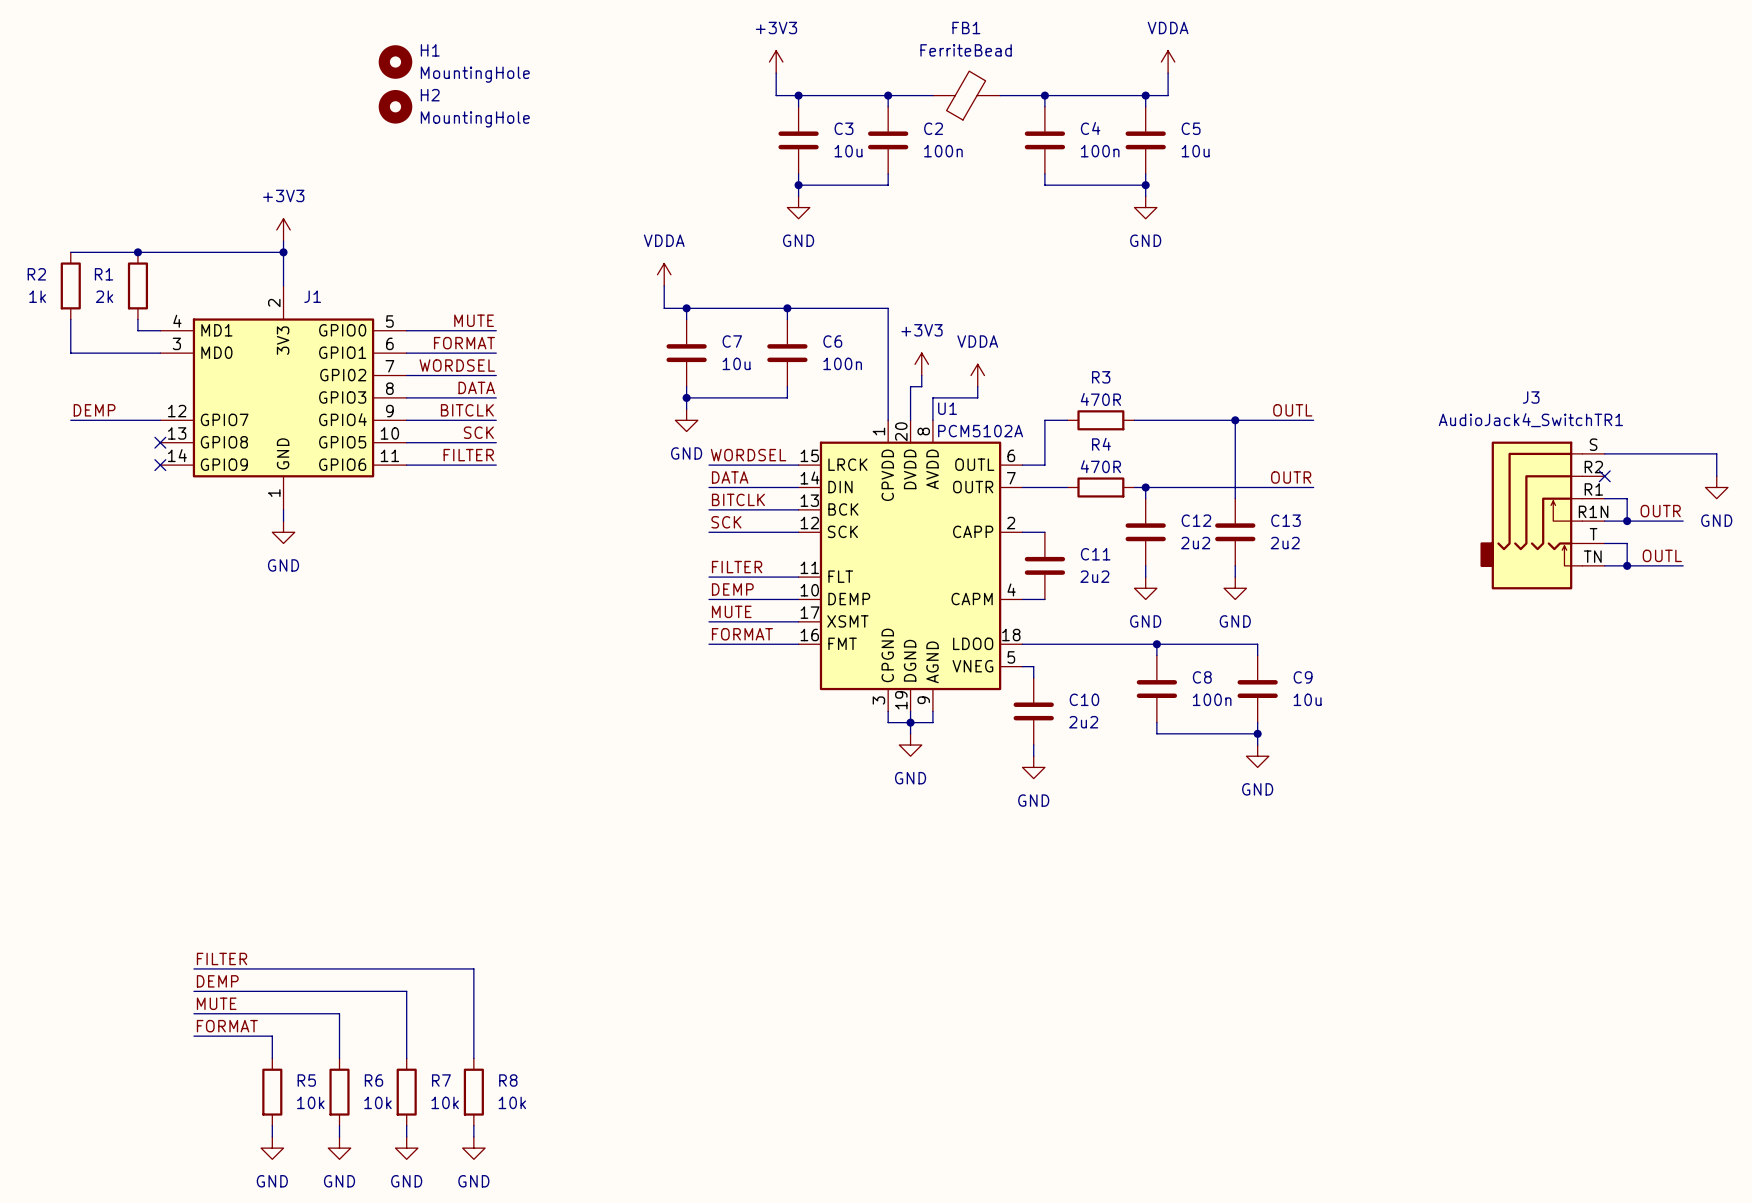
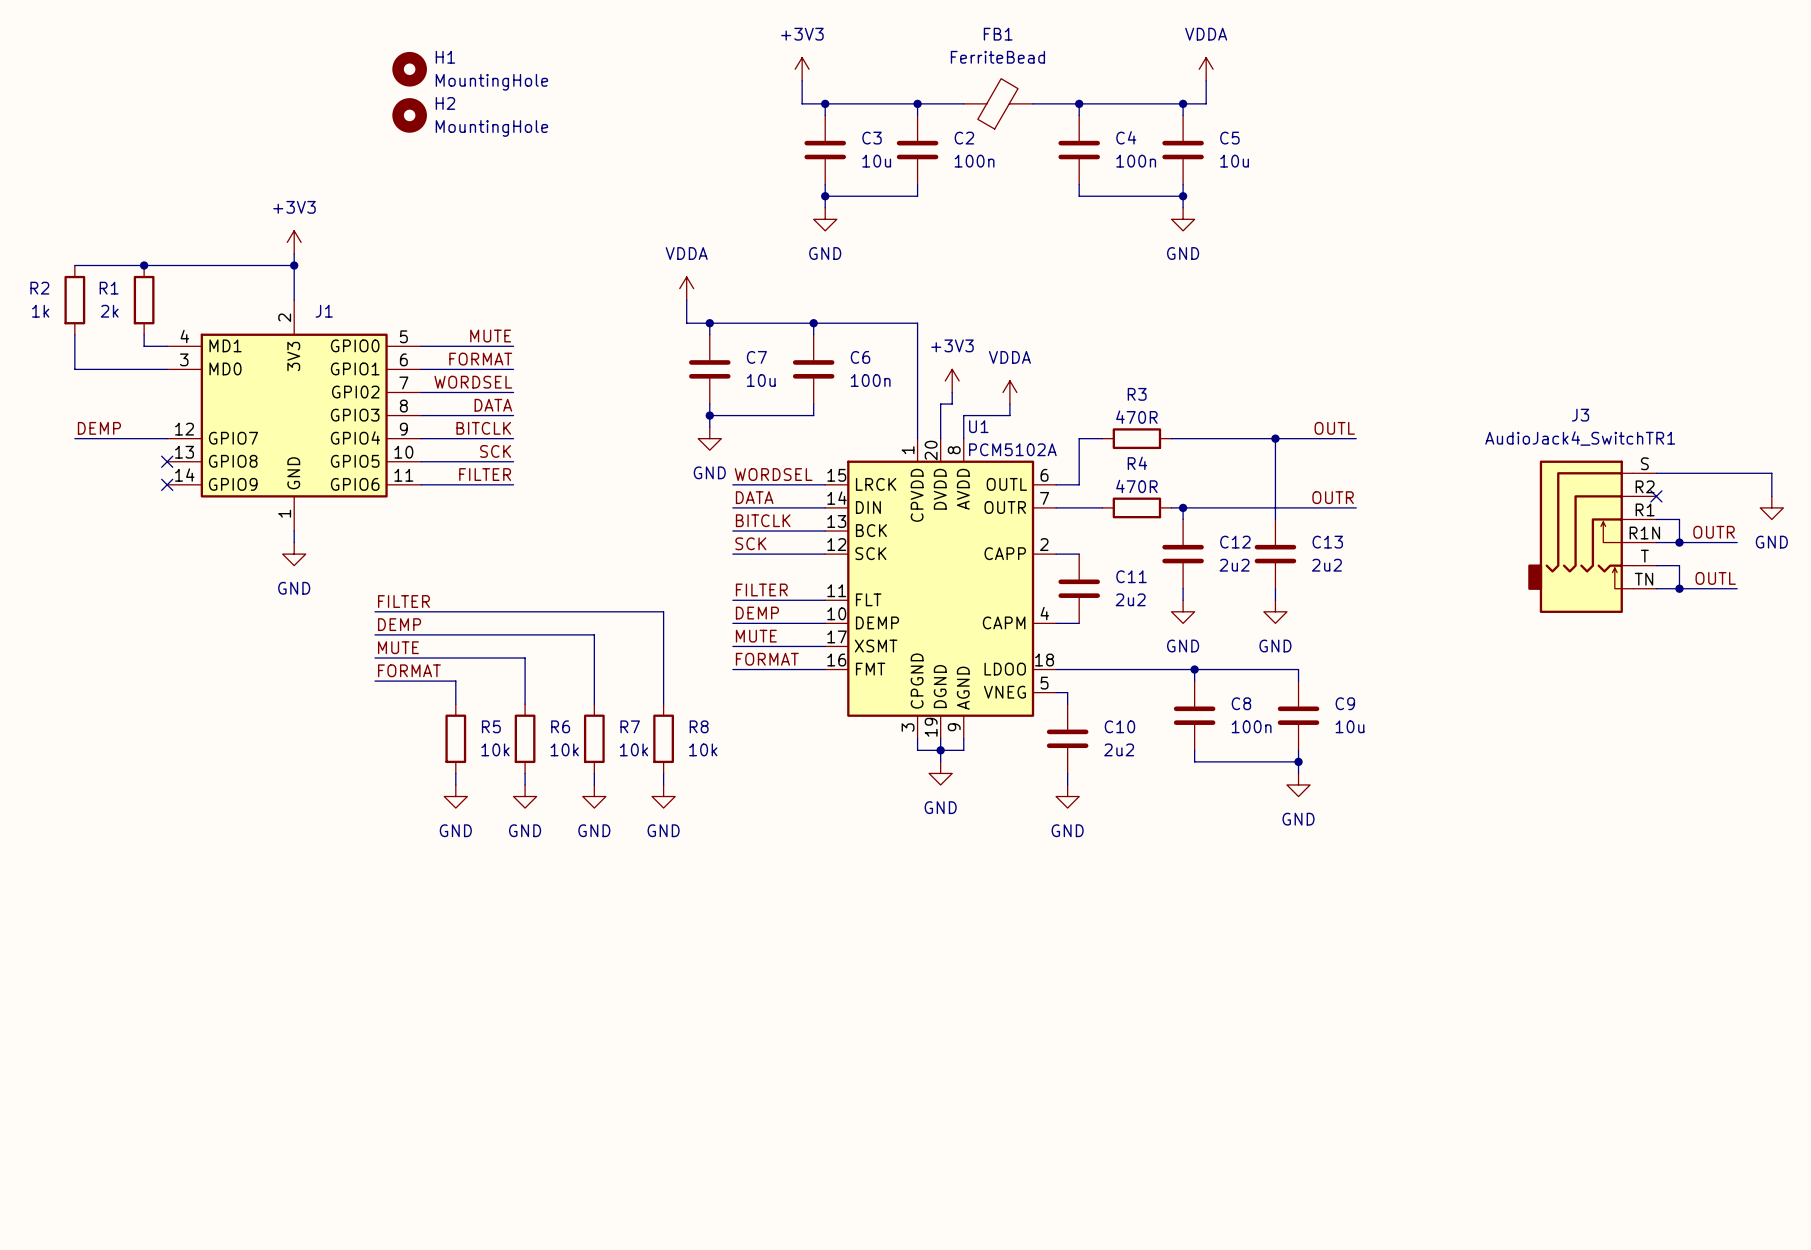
label: none -> FILTER (403, 601)
wire: none -> (375, 611) (663, 611) (663, 704)
label: none -> DEMP (399, 624)
wire: none -> (375, 634) (594, 634) (594, 704)
label: none -> MUTE (398, 647)
wire: none -> (375, 657) (525, 657) (525, 704)
label: none -> FORMAT (409, 670)
wire: none -> (375, 681) (455, 681) (455, 704)
wire: none -> (455, 773) (455, 784)
wire: none -> (525, 773) (525, 784)
wire: none -> (594, 773) (594, 784)
wire: none -> (663, 773) (663, 784)
power symbol: none -> GND (455, 796)
power symbol: none -> GND (525, 796)
power symbol: none -> GND (594, 796)
power symbol: none -> GND (663, 796)
label: FILTER (222, 958) -> none
wire: (193, 968) (473, 968) (473, 1058) -> none
label: DEMP (217, 981) -> none
wire: (193, 991) (406, 991) (406, 1058) -> none
label: MUTE (216, 1003) -> none
wire: (193, 1013) (339, 1013) (339, 1058) -> none
label: FORMAT (227, 1026) -> none
wire: (193, 1036) (272, 1036) (272, 1058) -> none
R5 position: (272, 1092) -> (455, 738)
R6 position: (339, 1092) -> (525, 738)
R7 position: (406, 1092) -> (594, 738)
R8 position: (473, 1092) -> (663, 738)
wire: (272, 1125) (272, 1136) -> none
wire: (339, 1125) (339, 1136) -> none
wire: (406, 1125) (406, 1136) -> none
wire: (473, 1125) (473, 1136) -> none
power symbol: GND (272, 1148) -> none
power symbol: GND (339, 1148) -> none
power symbol: GND (406, 1148) -> none
power symbol: GND (473, 1148) -> none

